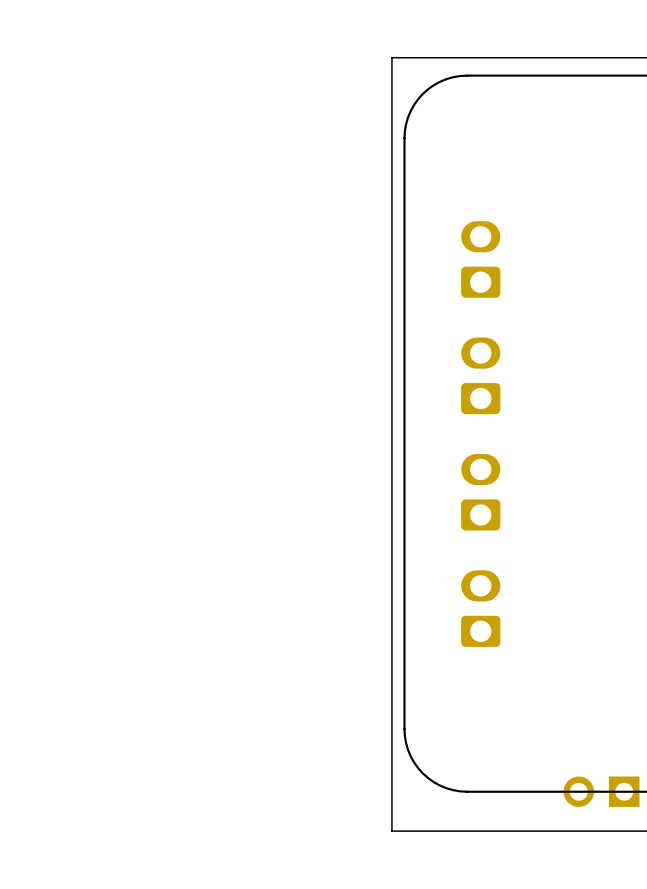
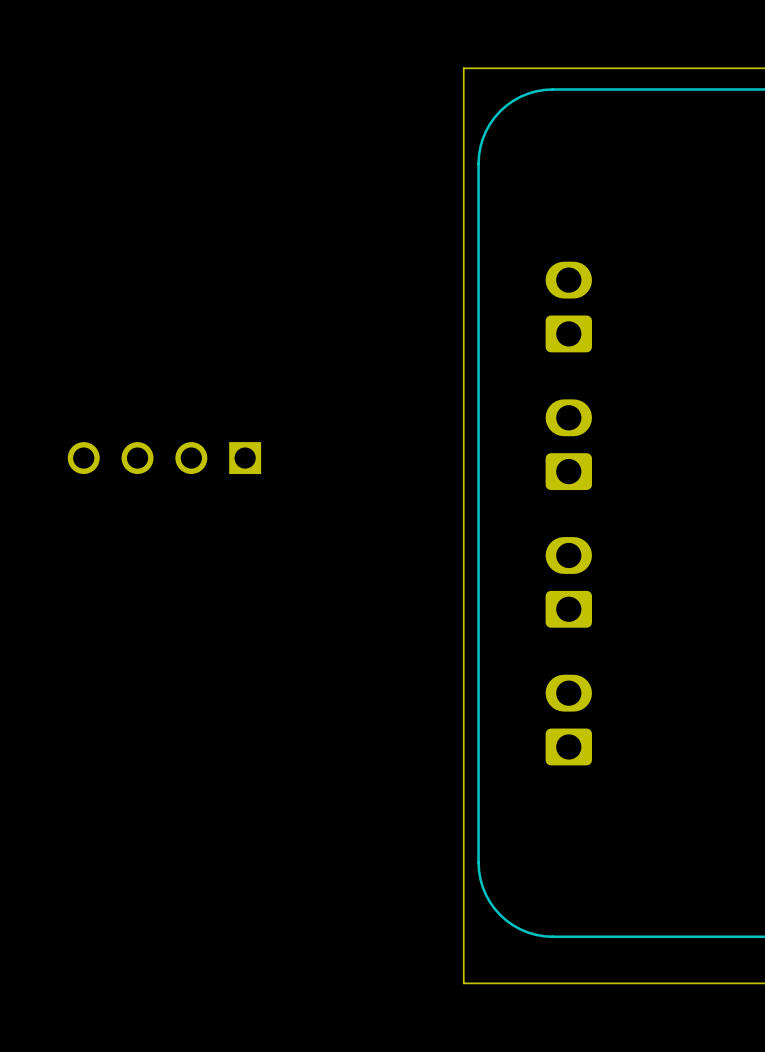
part: none -> (164, 458)
part: (601, 791) -> none

